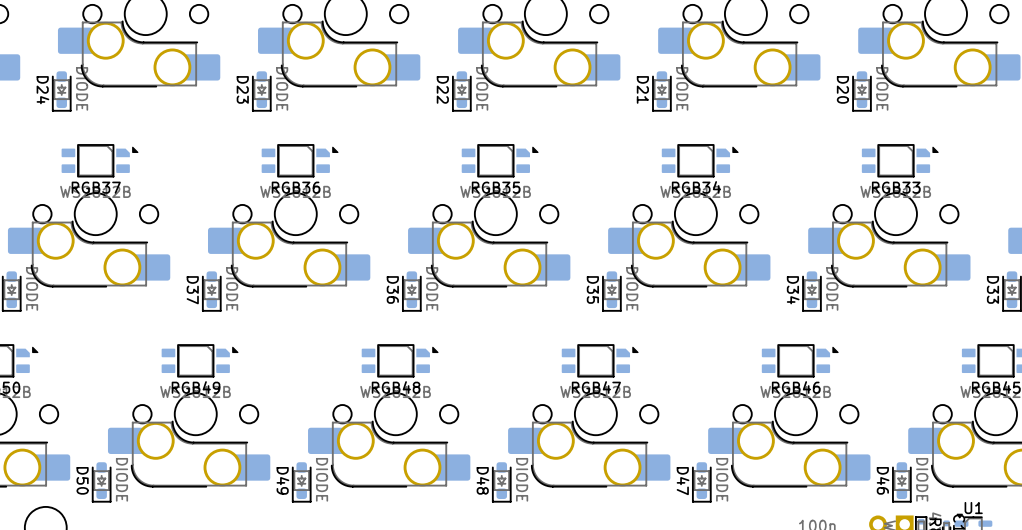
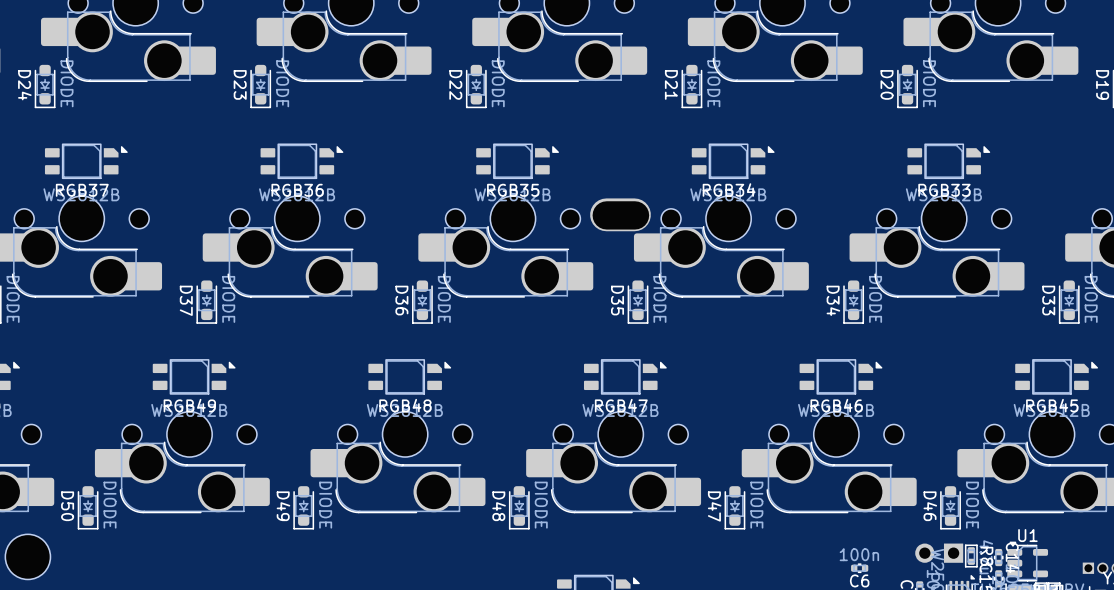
part: none -> (620, 214)

